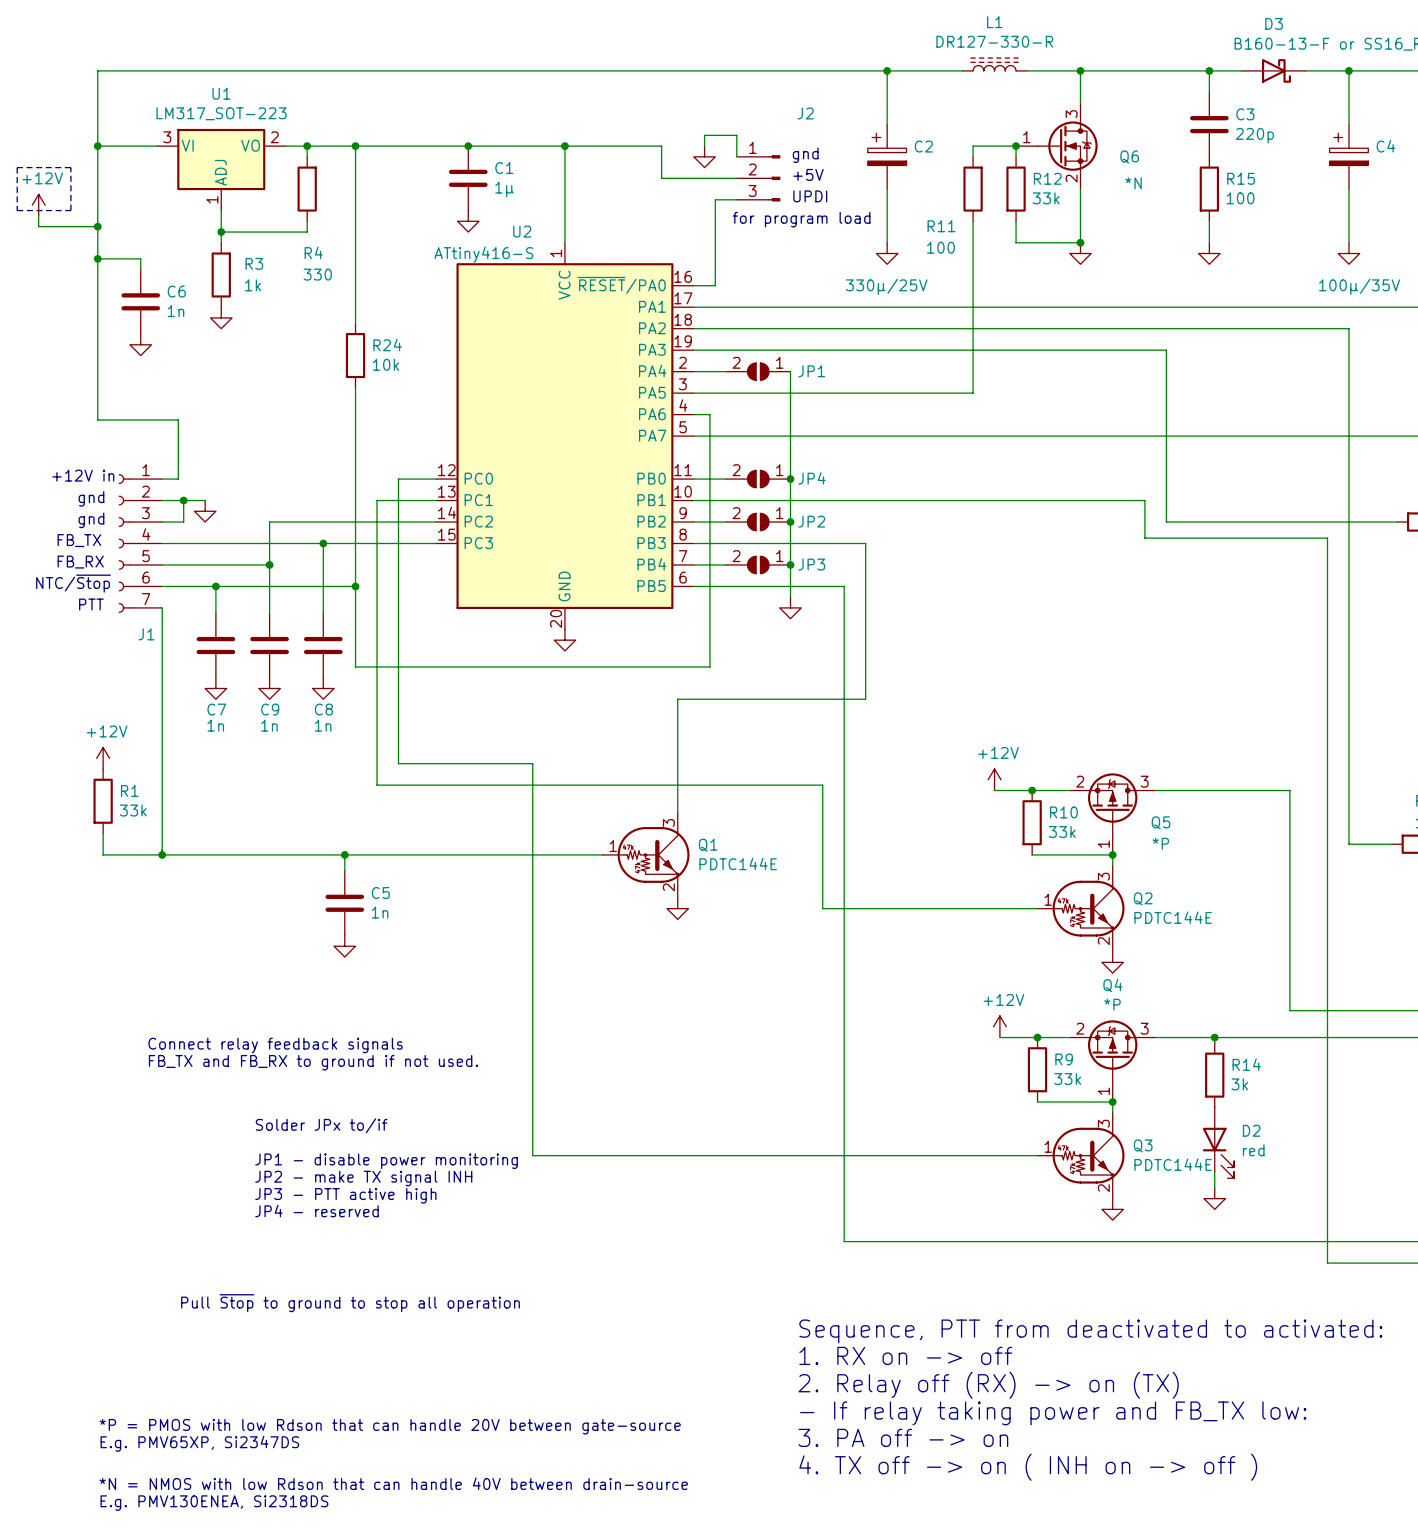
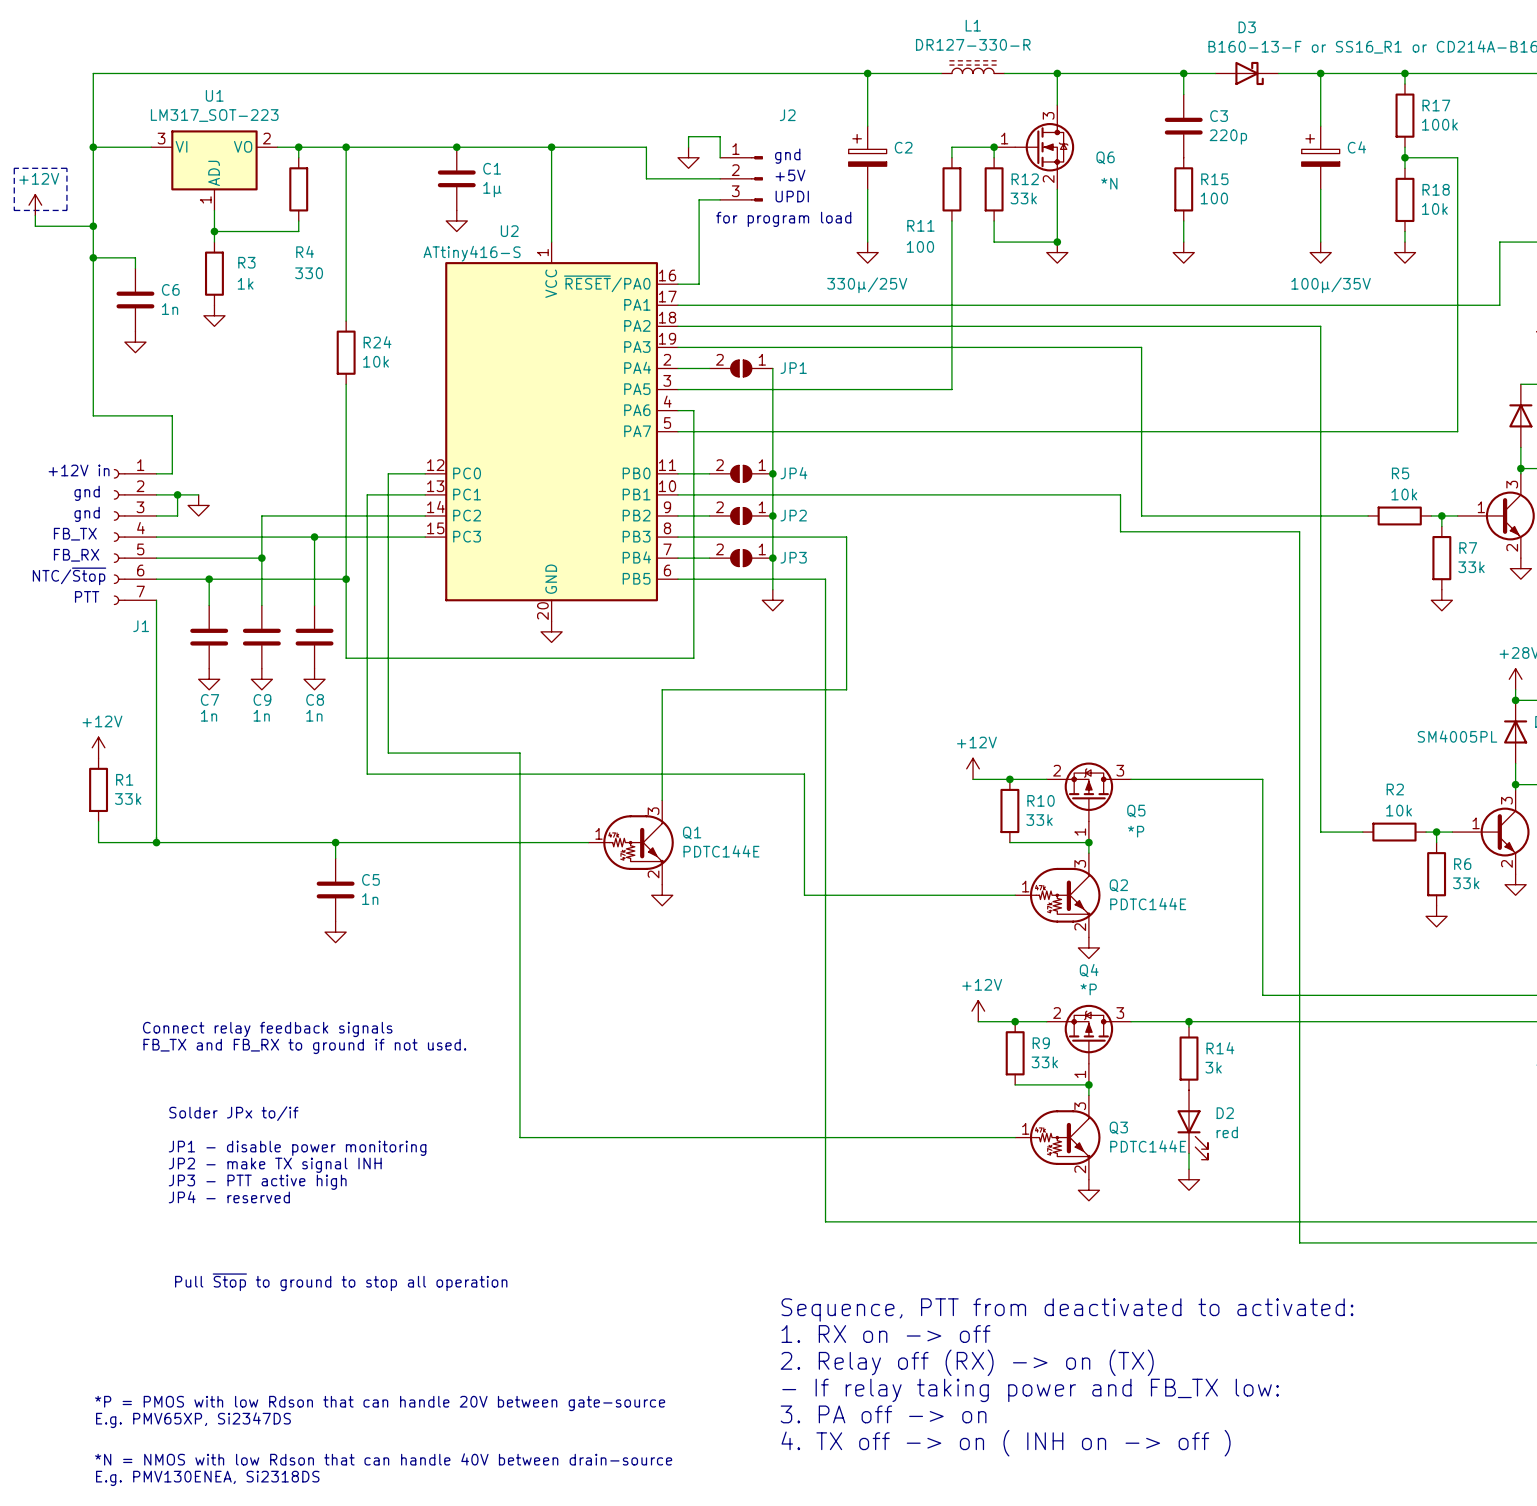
text position: Solder JPx to/if (321, 1125) -> Solder JPx to/if (233, 1113)
text position: JP1 - disable power monitoring (386, 1161) -> JP1 - disable power monitoring (297, 1148)
text position: JP2 - make TX signal INH (363, 1178) -> JP2 - make TX signal INH (275, 1165)
text position: JP3 - PTT active high (345, 1195) -> JP3 - PTT active high (257, 1182)
text position: JP4 - reserved (316, 1211) -> JP4 - reserved (229, 1197)

